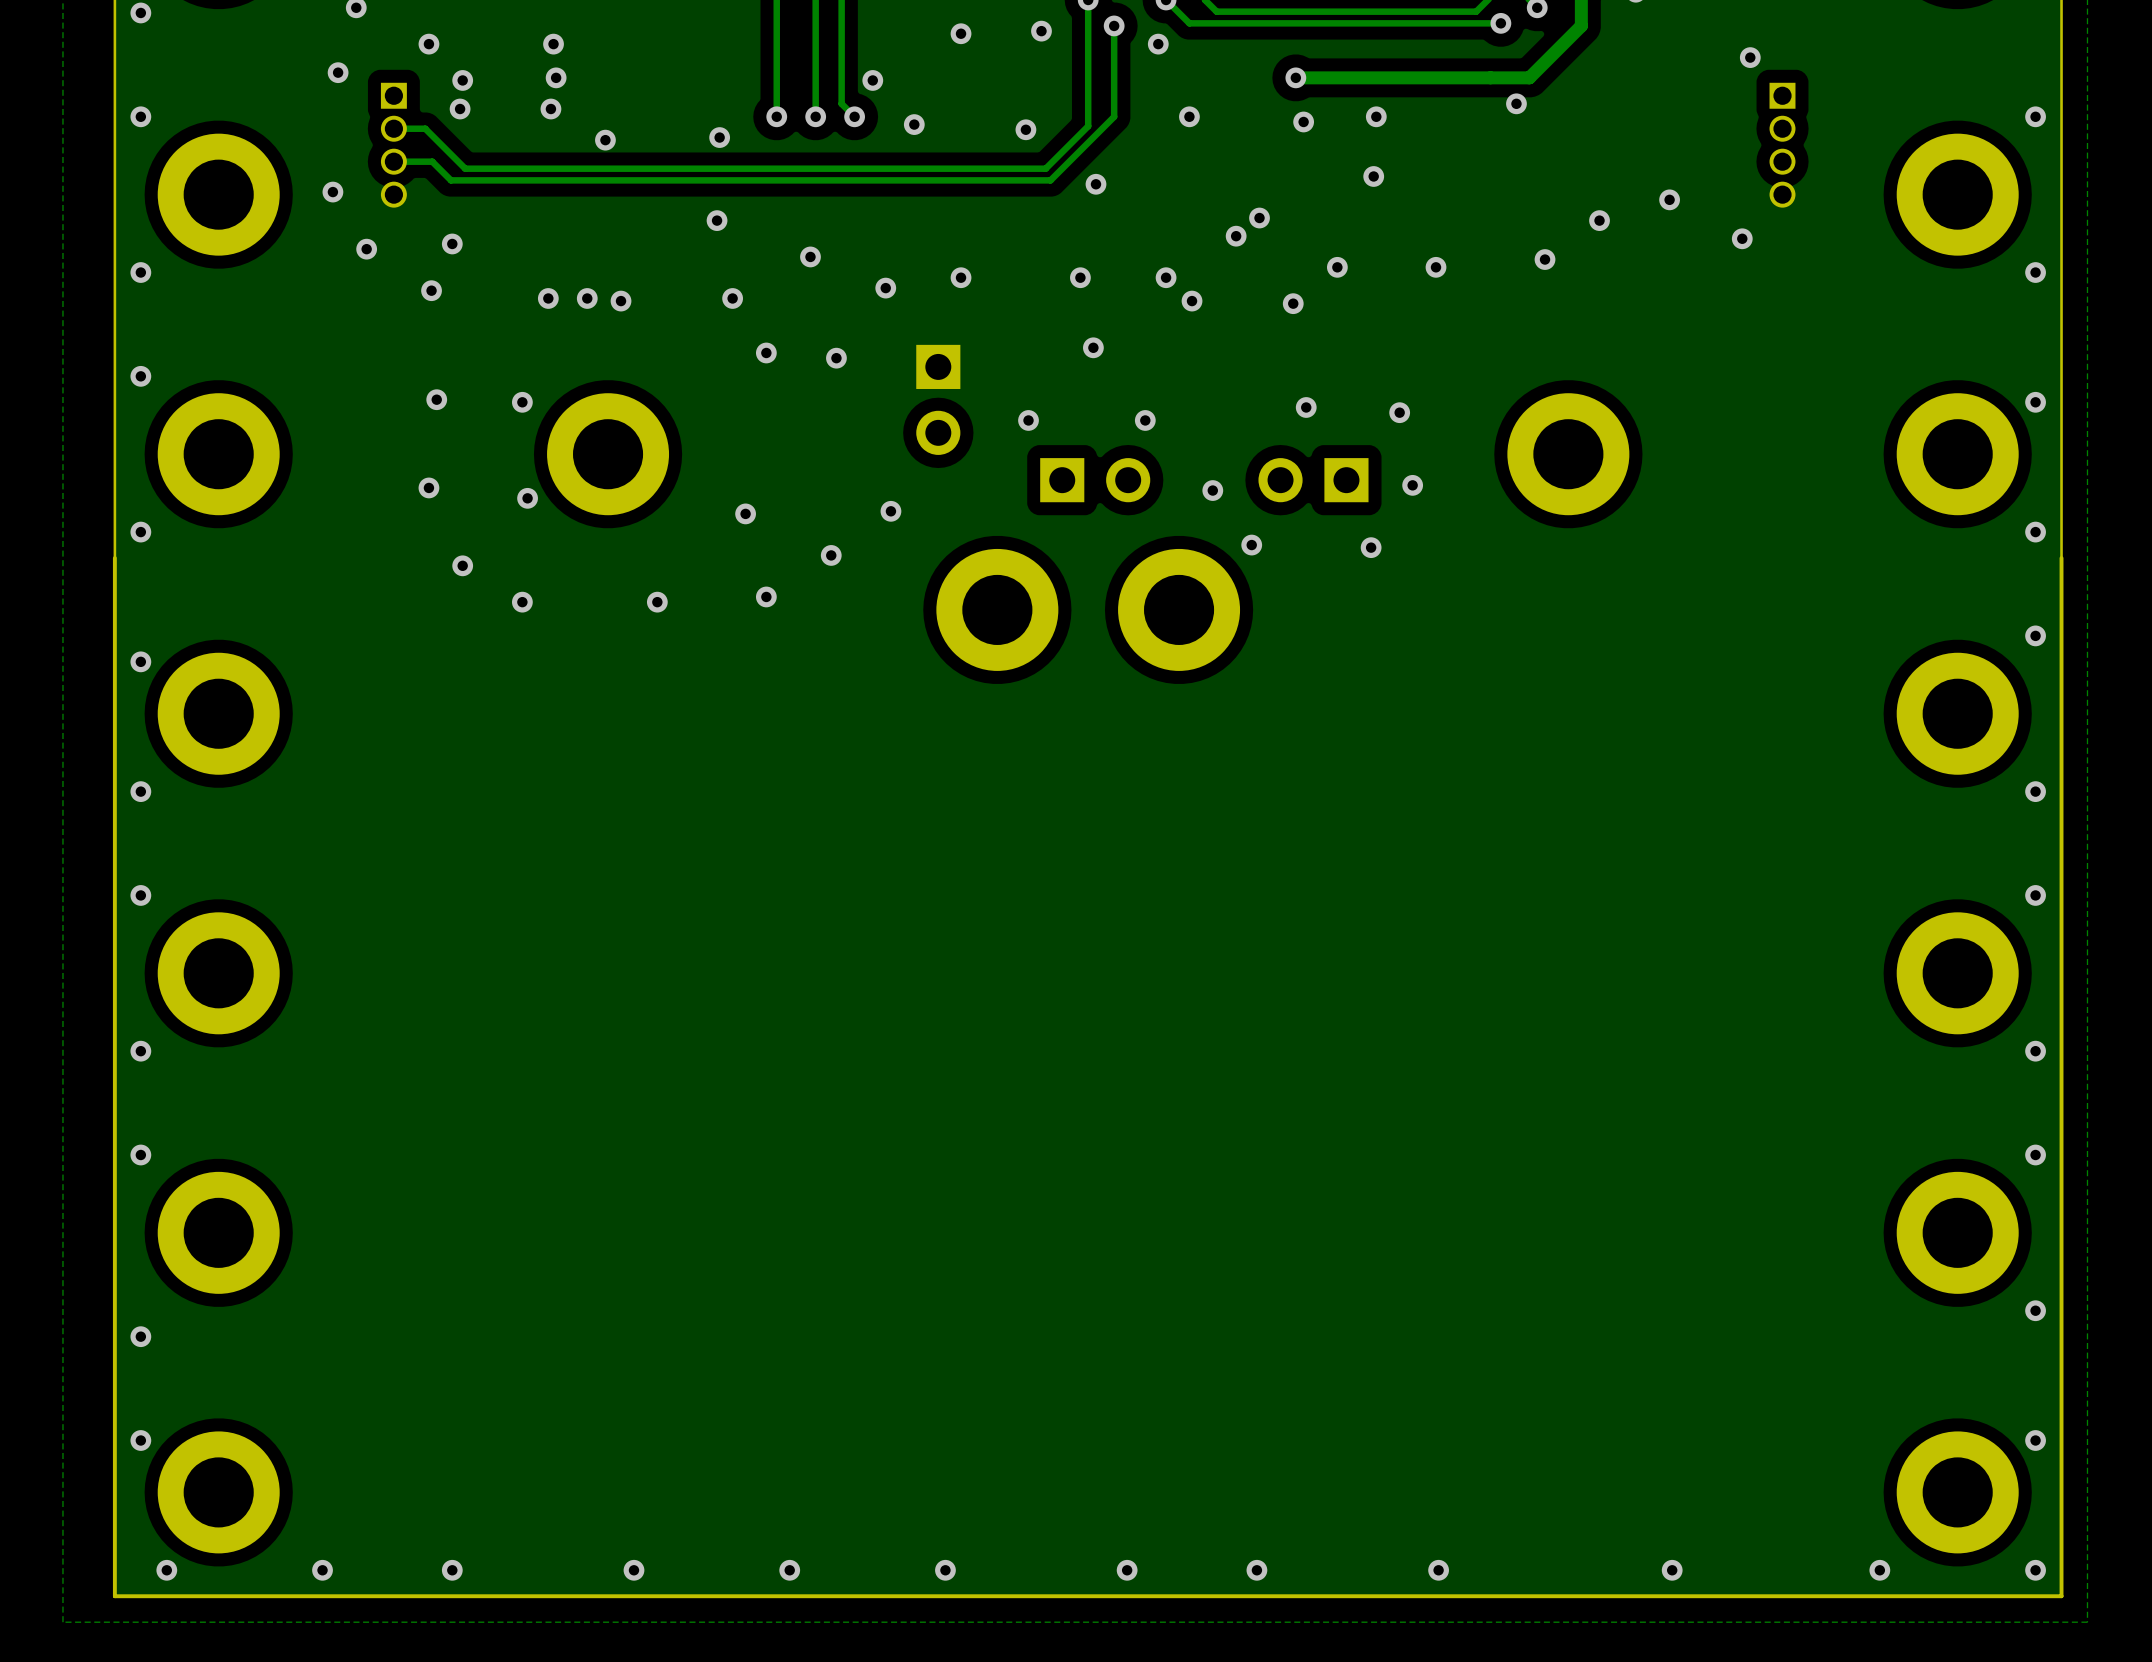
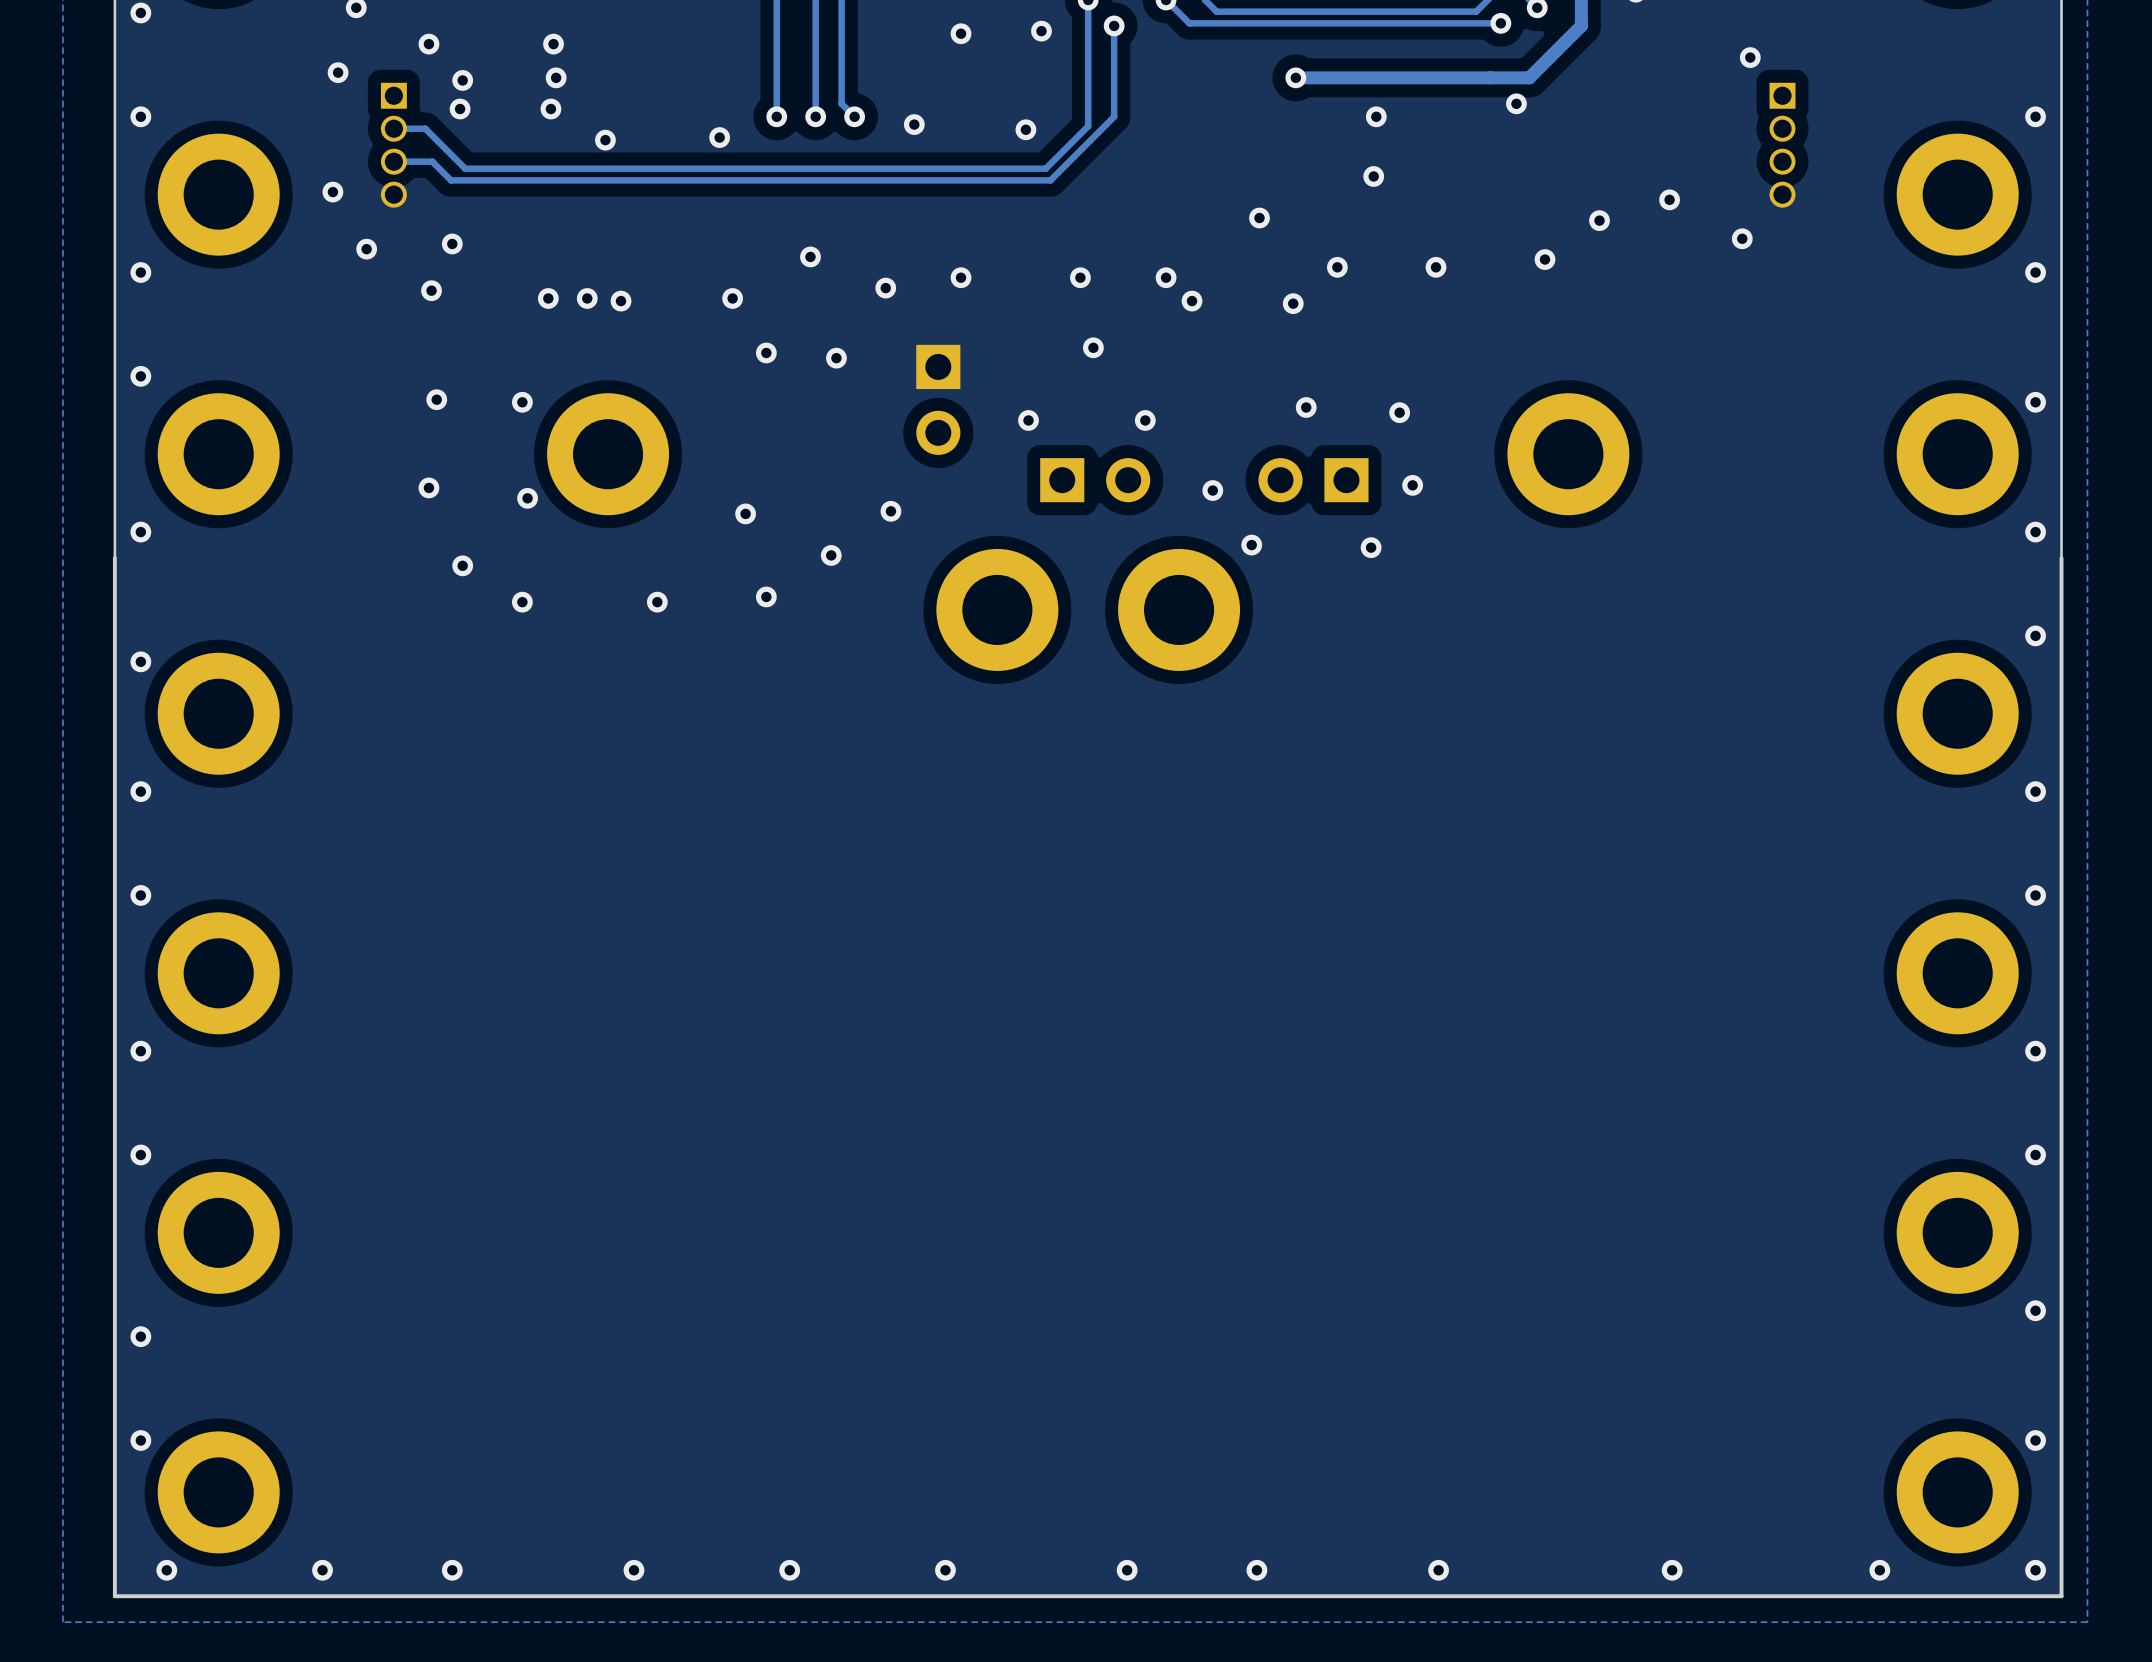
via: (1158, 44) -> none
via: (872, 80) -> none
via: (1189, 116) -> none
via: (1303, 121) -> none
via: (1095, 184) -> none
via: (717, 220) -> none
via: (1236, 236) -> none

